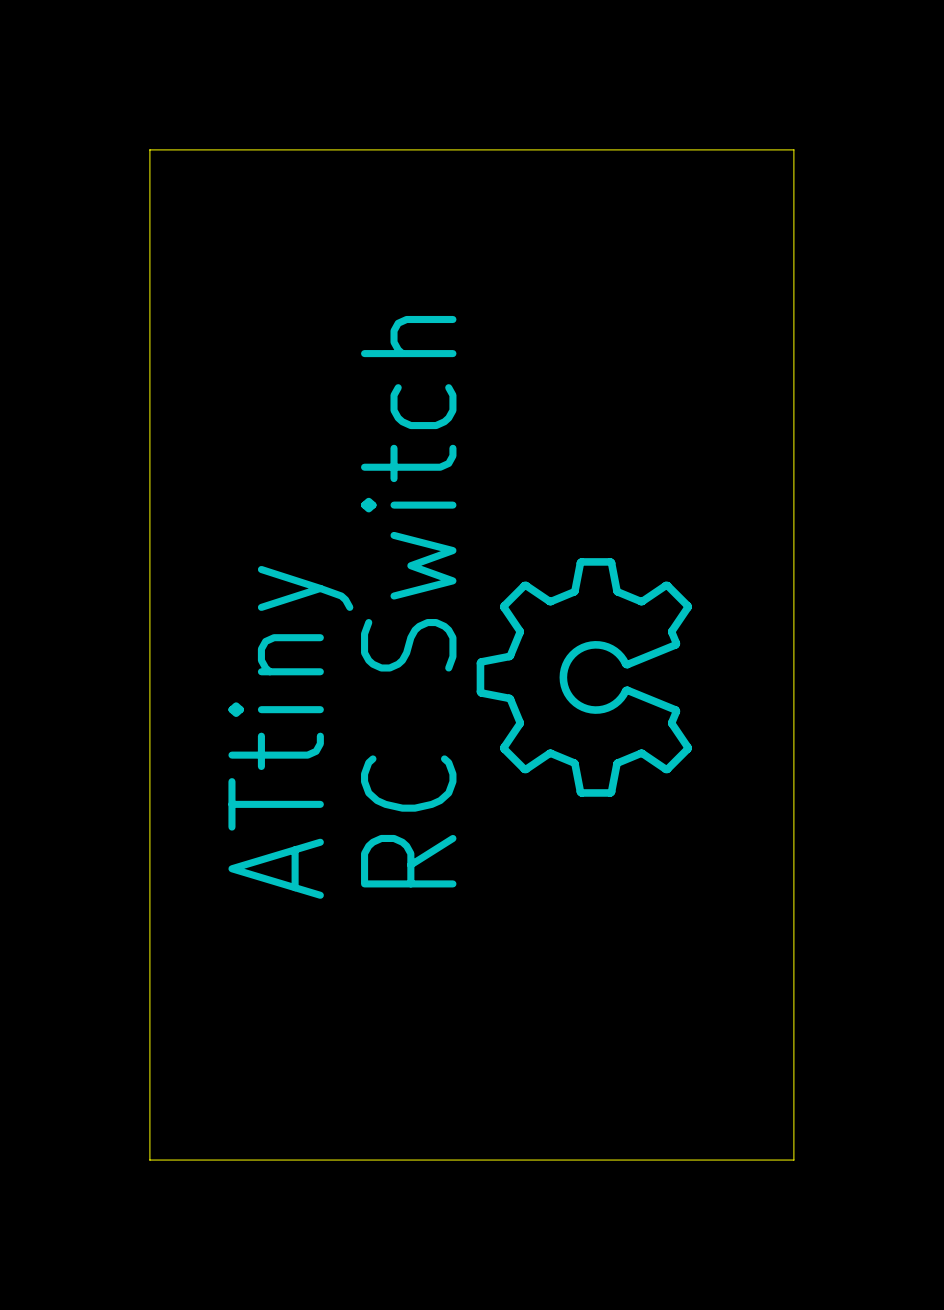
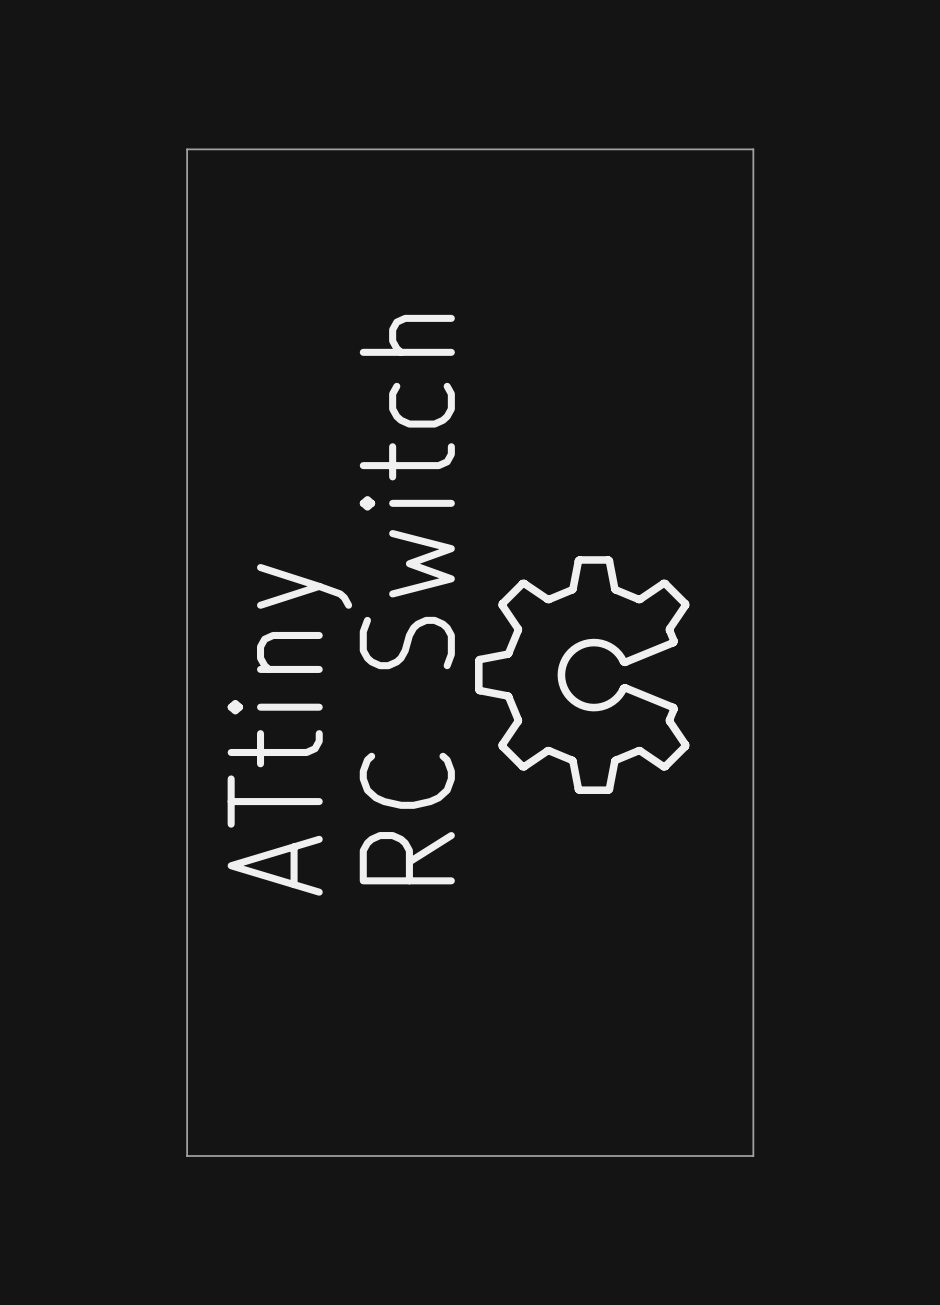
board edge: (187, 149) (149, 149) (149, 1160) (187, 1160) -> (187, 149) (187, 1156)
board edge: (755, 149) (793, 149) (793, 1160) (755, 1160) -> (753, 149) (753, 1156)

